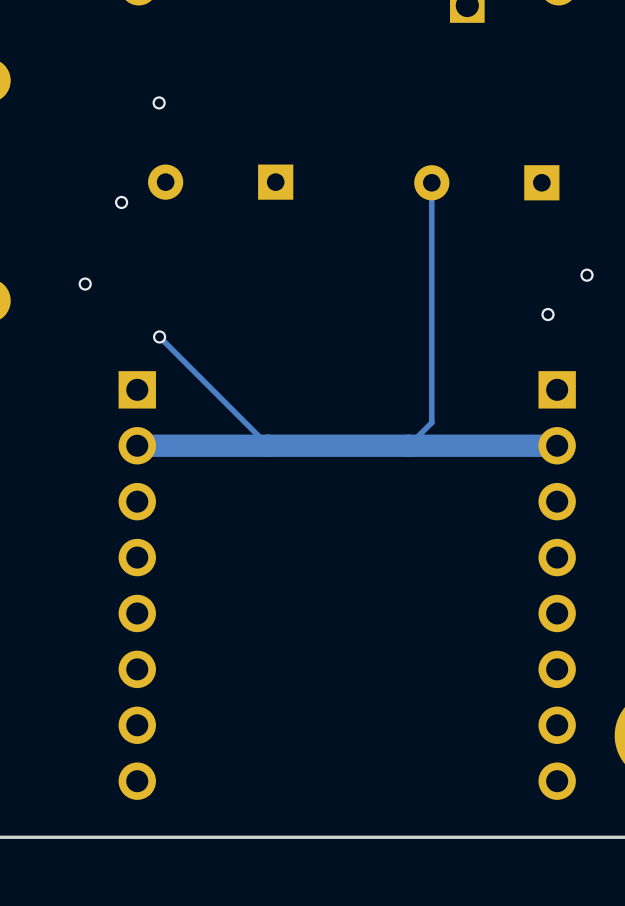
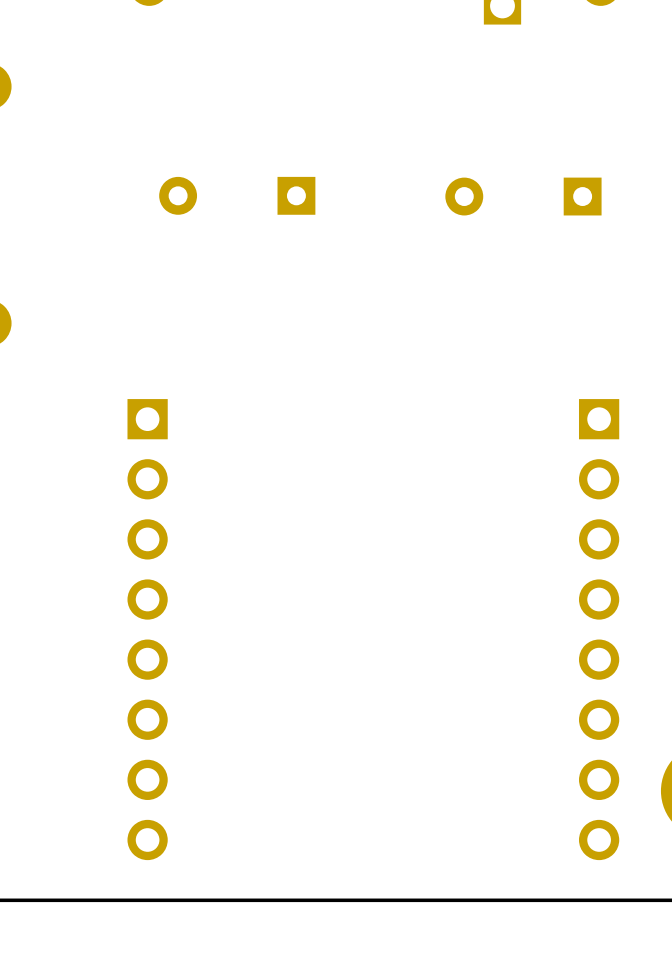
via: (159, 102) -> none
track: (431, 182) (431, 422) (408, 445) -> none
via: (121, 202) -> none
via: (587, 275) -> none
via: (85, 284) -> none
via: (548, 314) -> none
track: (159, 336) (268, 445) -> none
via: (159, 336) -> none
track: (557, 445) (137, 445) -> none

